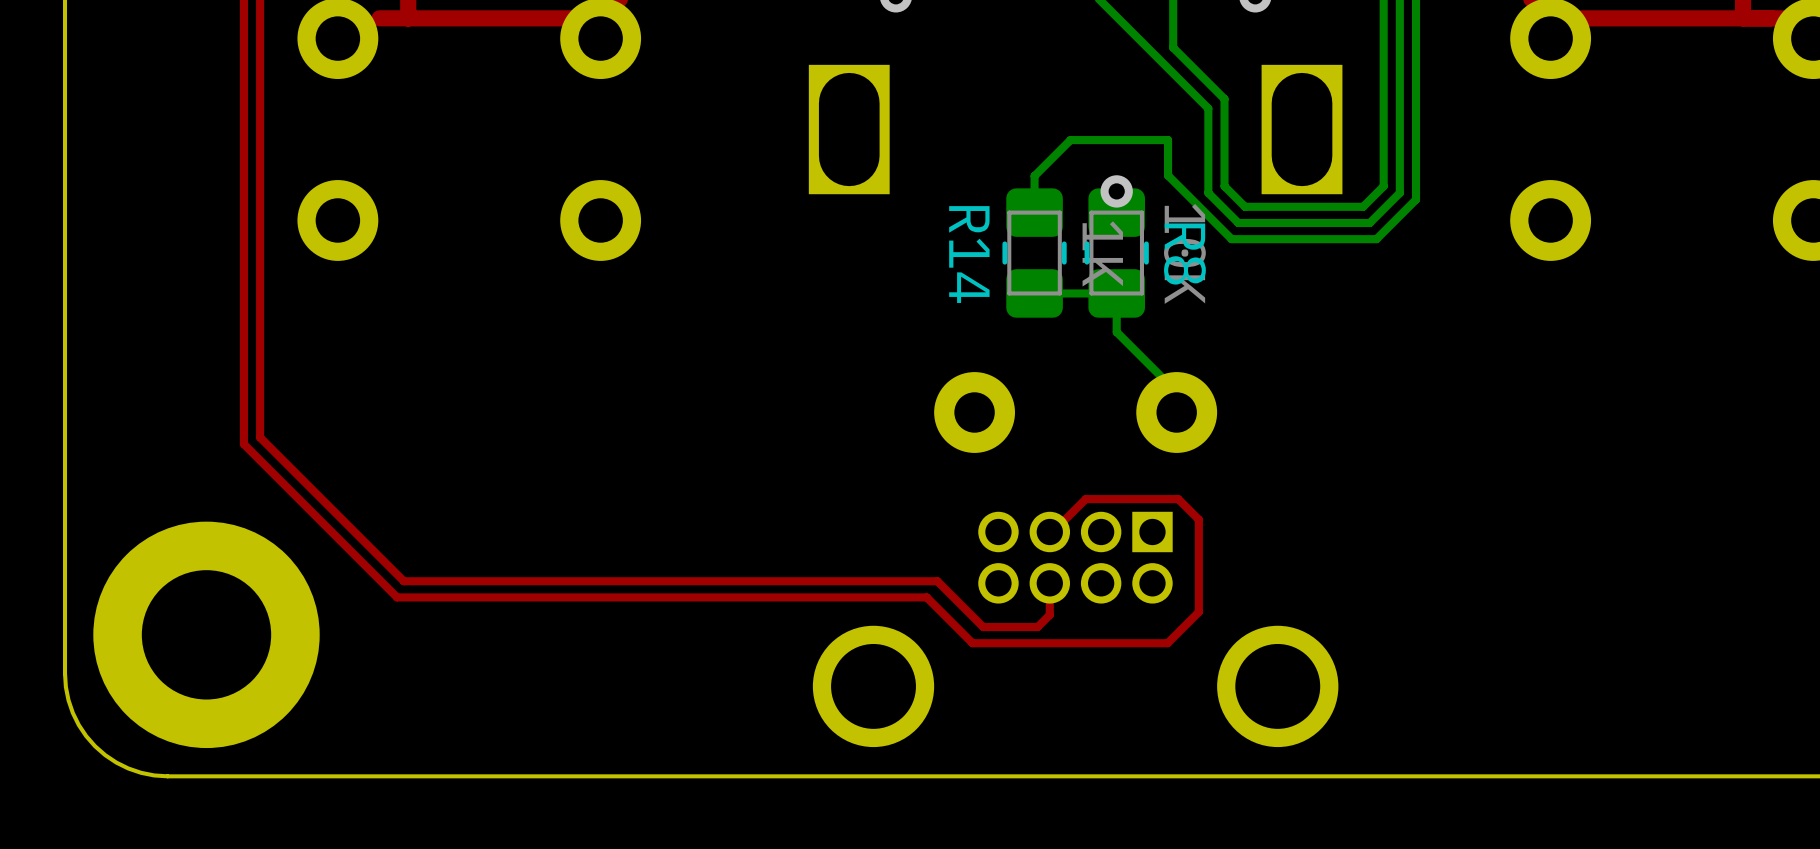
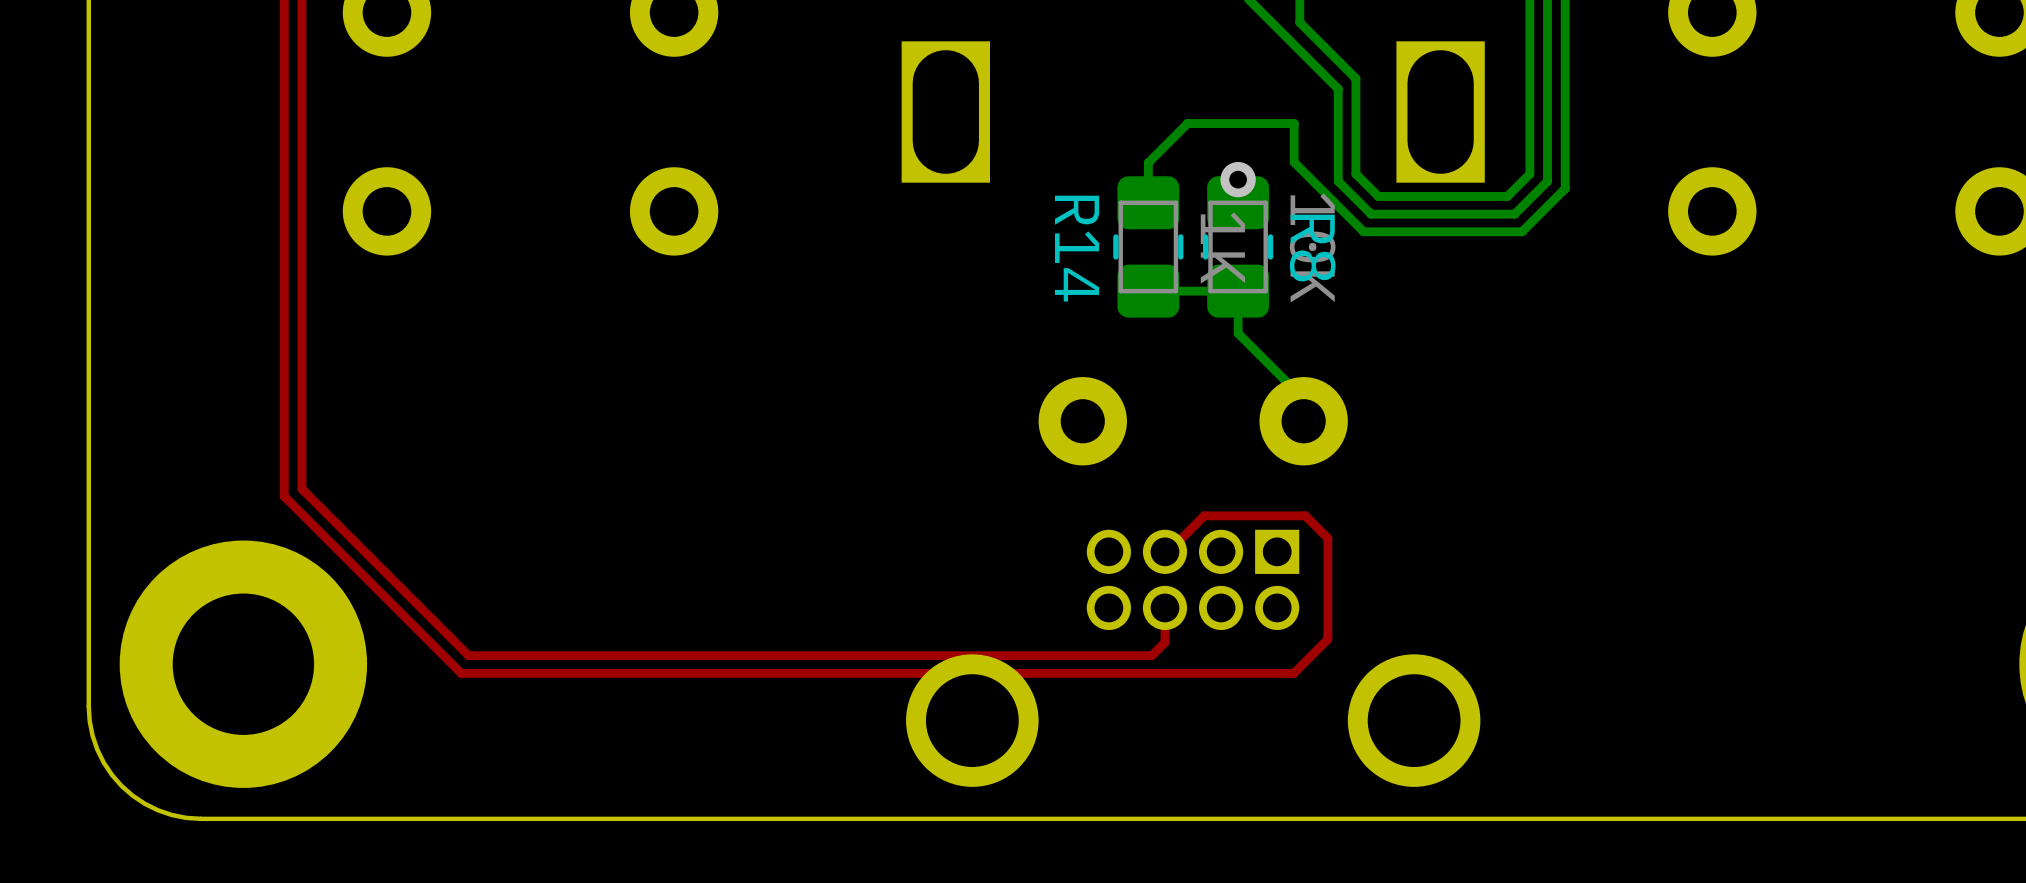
top track: (260, 437) (403, 581) (937, 581) (983, 627) -> (301, 448) (301, 489) (468, 655) (1092, 655)
top track: (243, 444) (397, 597) (926, 597) (972, 643) -> (284, 455) (284, 496) (461, 673) (1080, 673)

